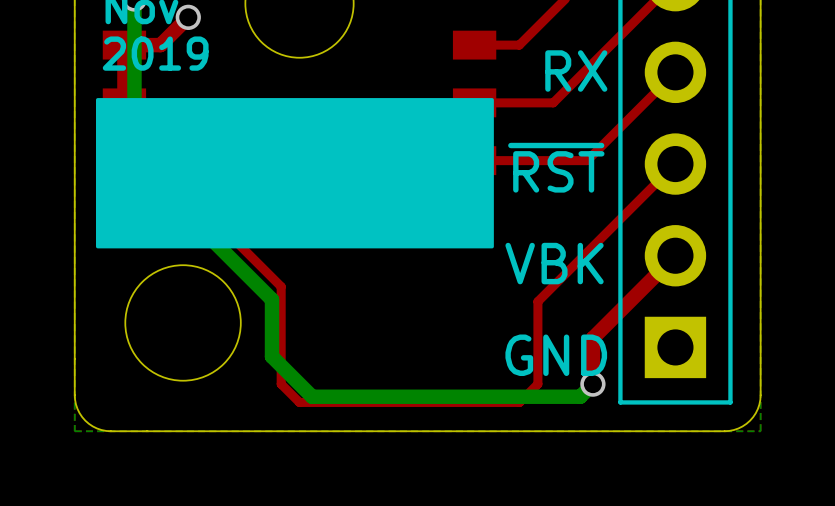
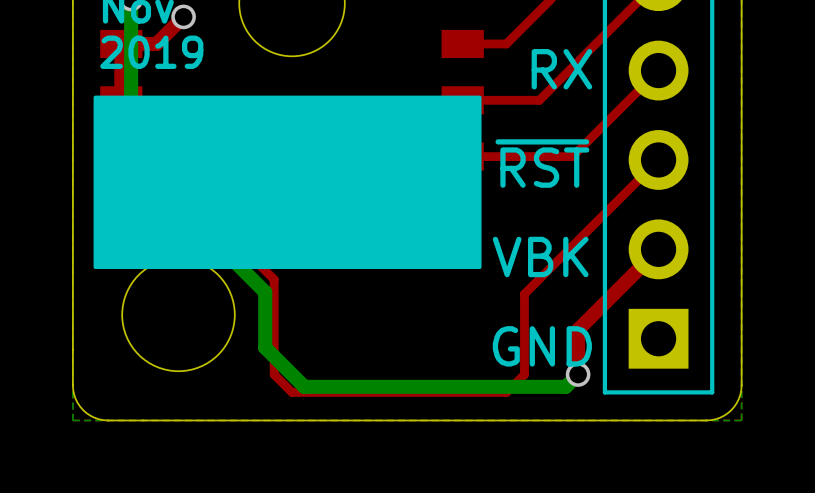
drawing shape: [95, 98, 494, 249] -> [93, 95, 482, 269]

